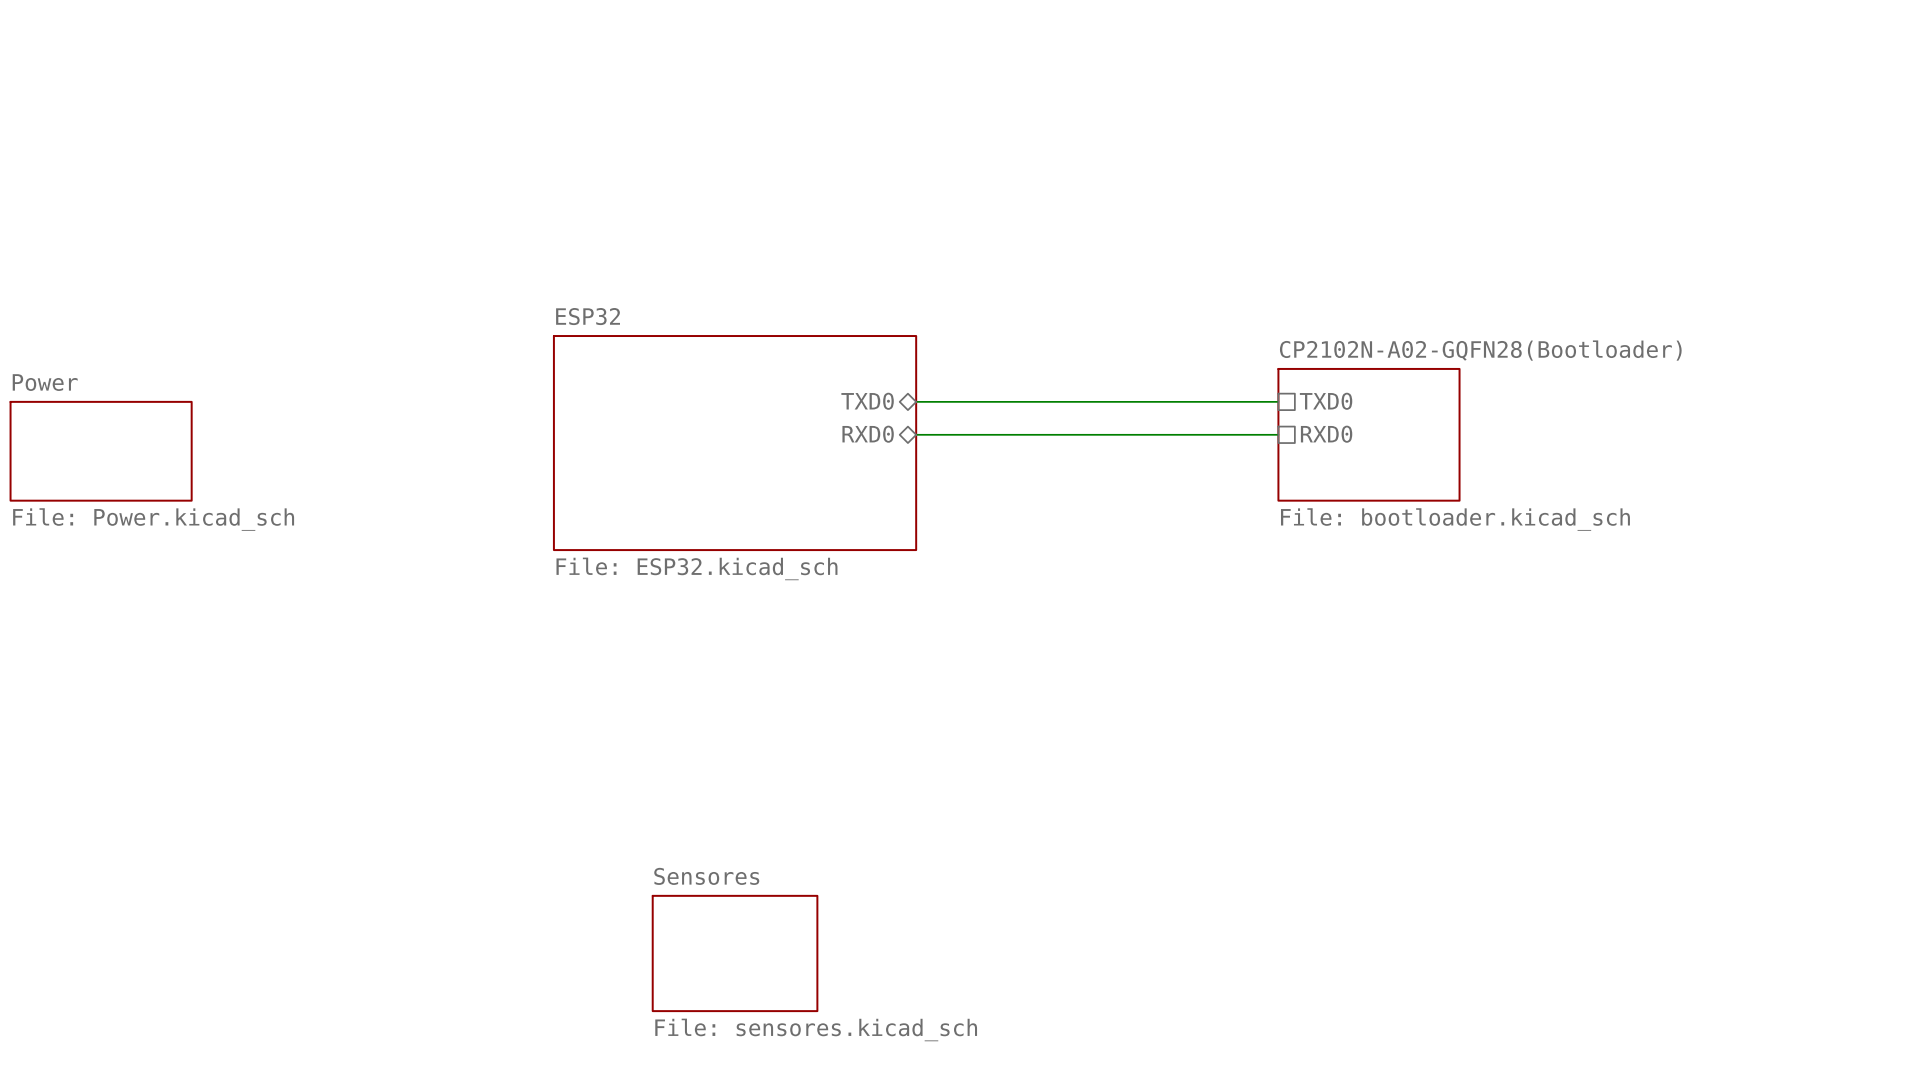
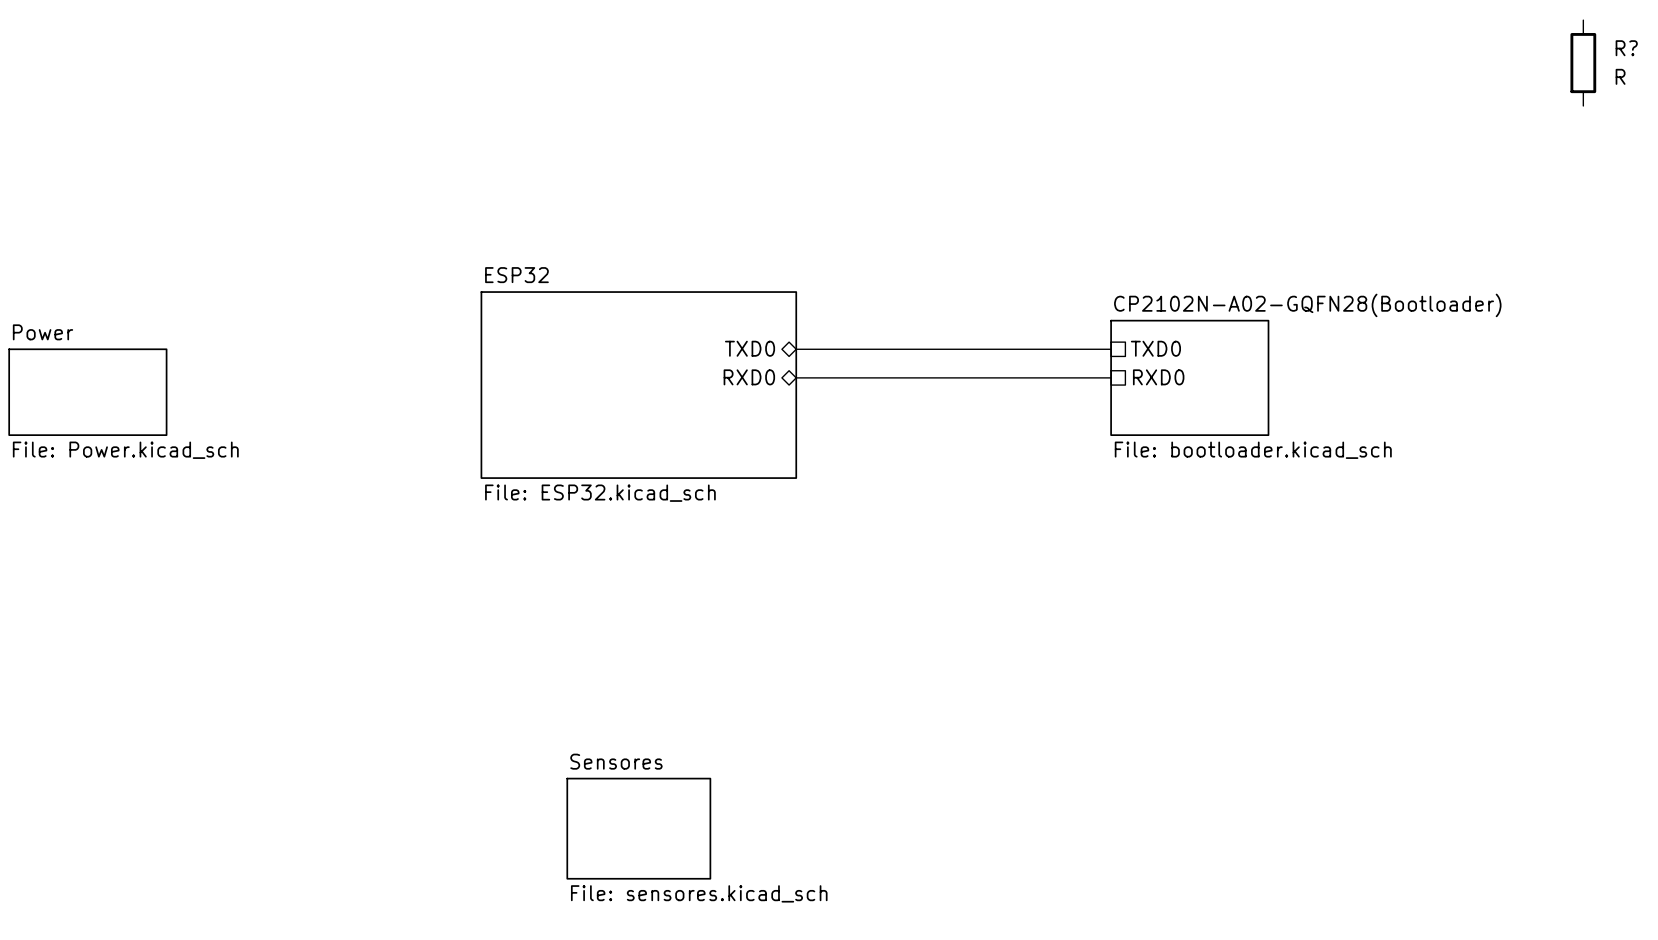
R?: none -> R (1583, 63)

